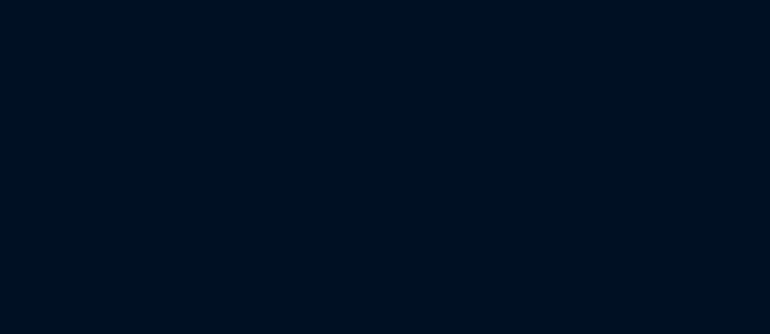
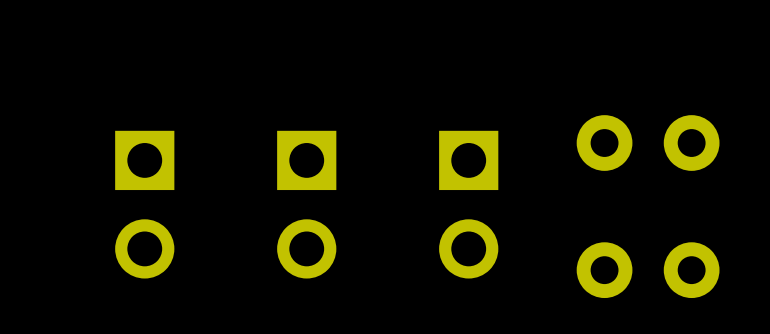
part: none -> (648, 143)
part: none -> (144, 204)
part: none -> (306, 204)
part: none -> (468, 204)
part: none -> (648, 270)

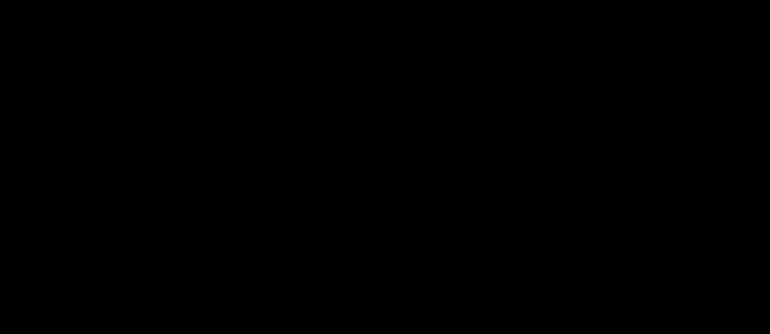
part: (648, 143) -> none
part: (144, 204) -> none
part: (306, 204) -> none
part: (468, 204) -> none
part: (648, 270) -> none

